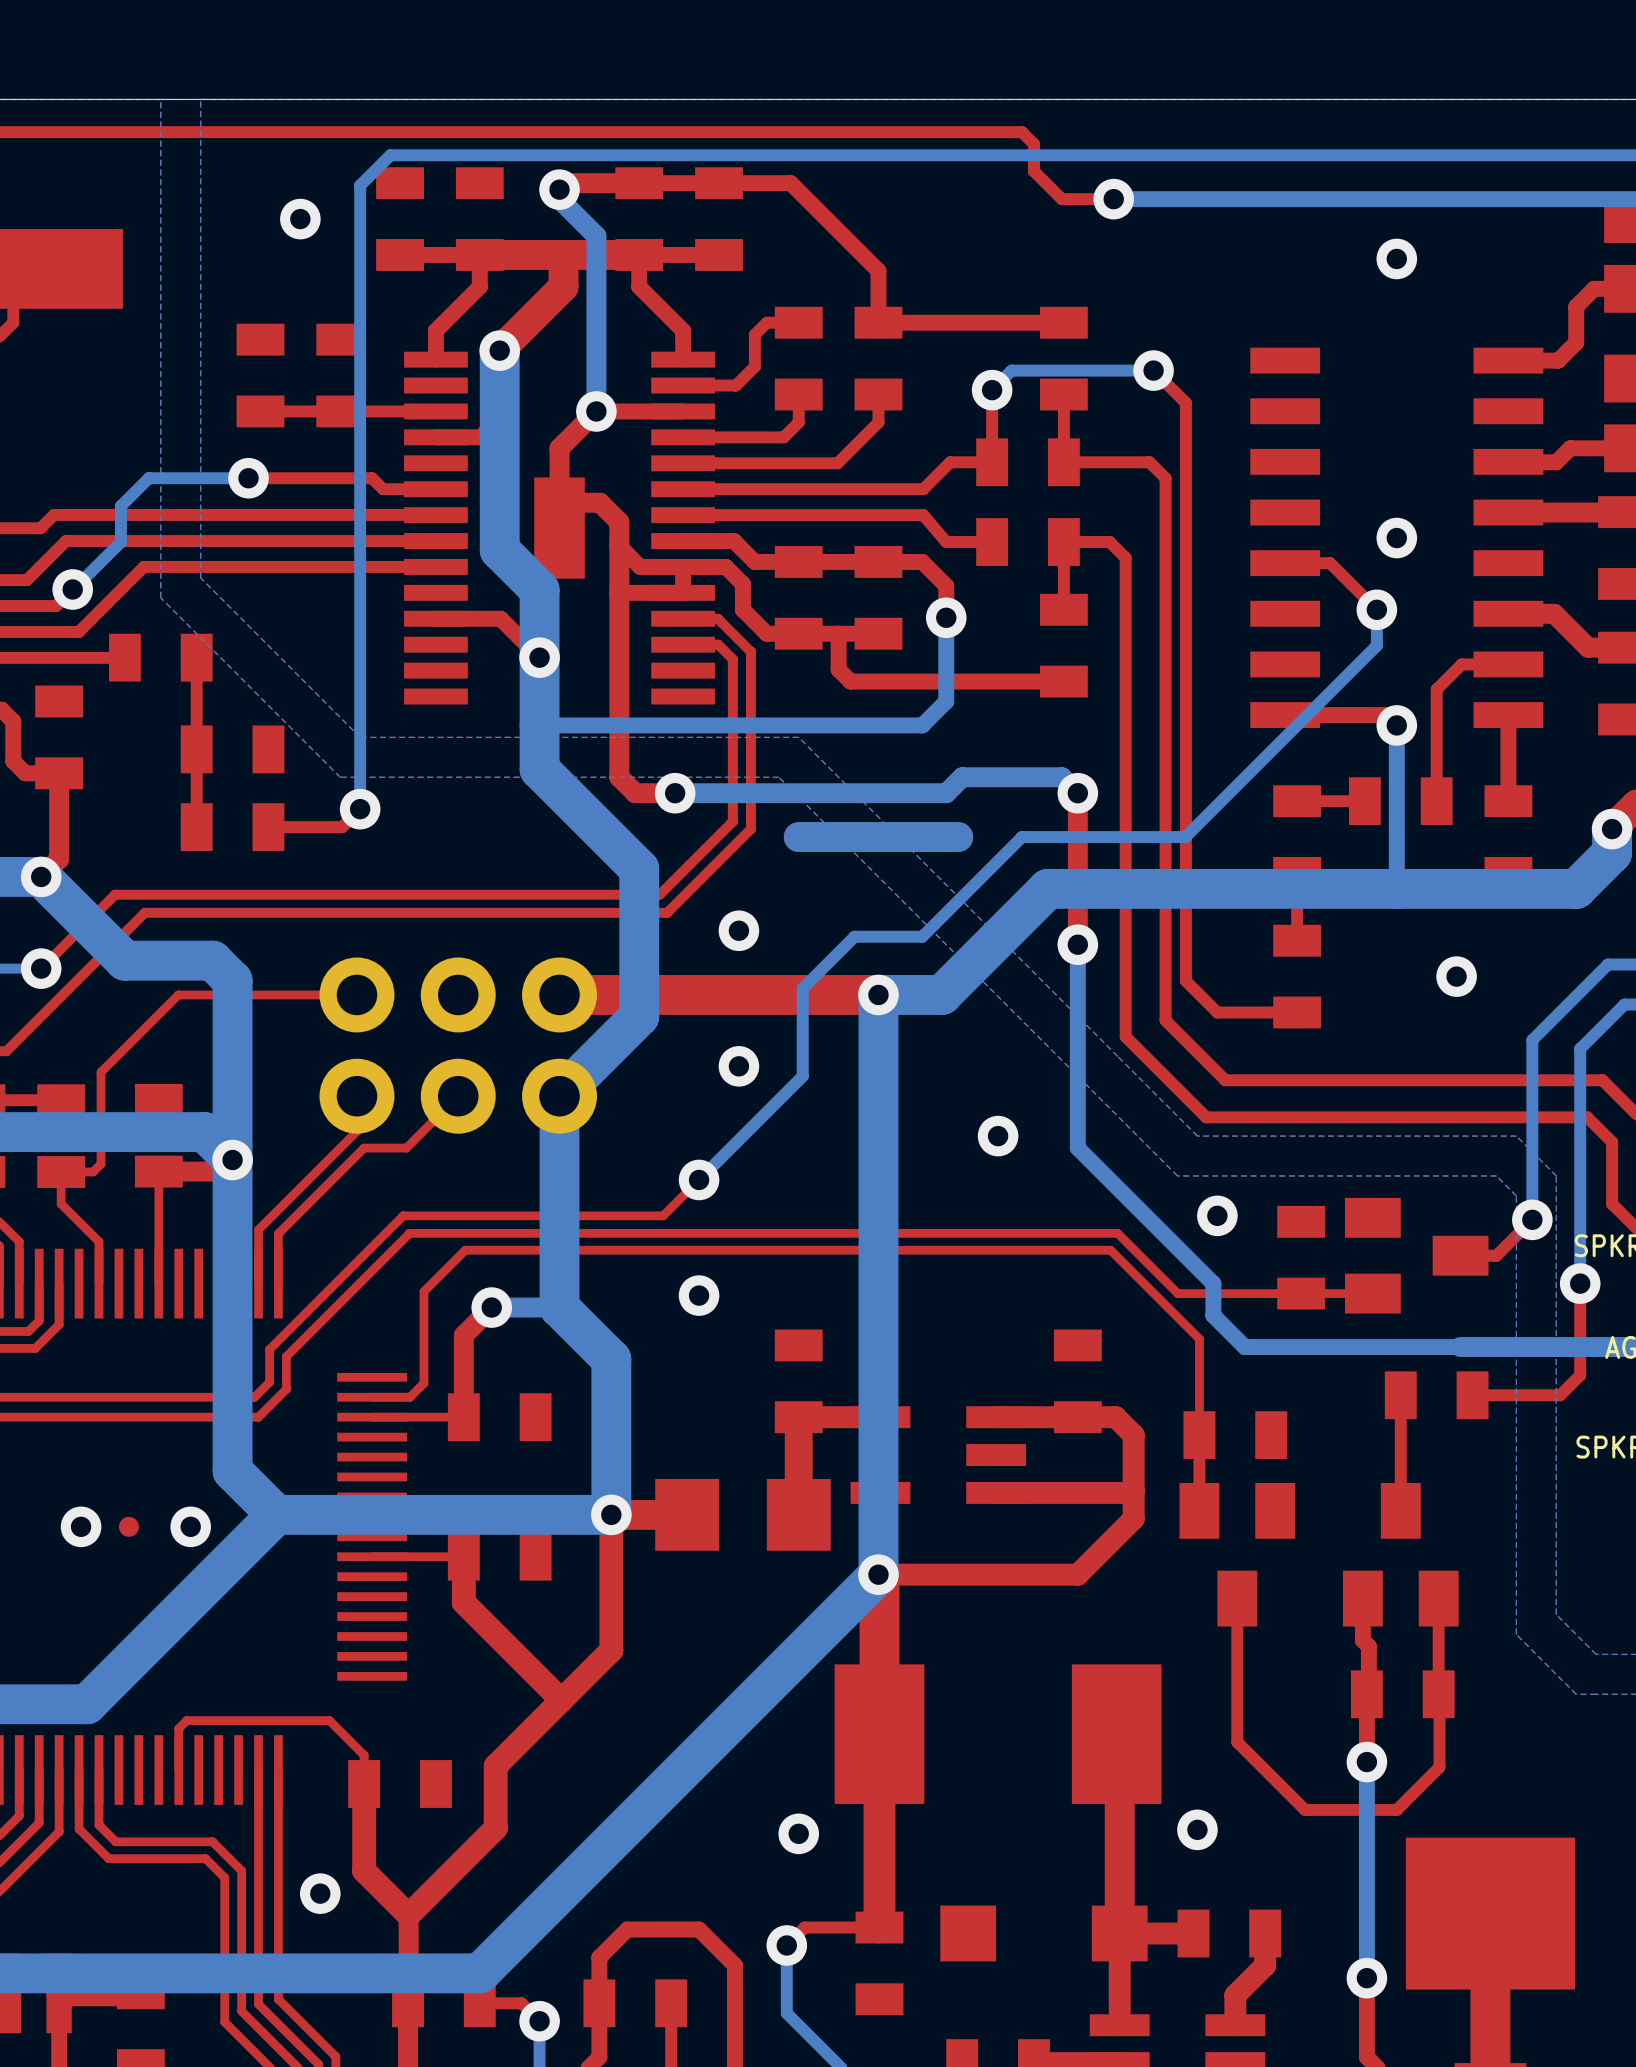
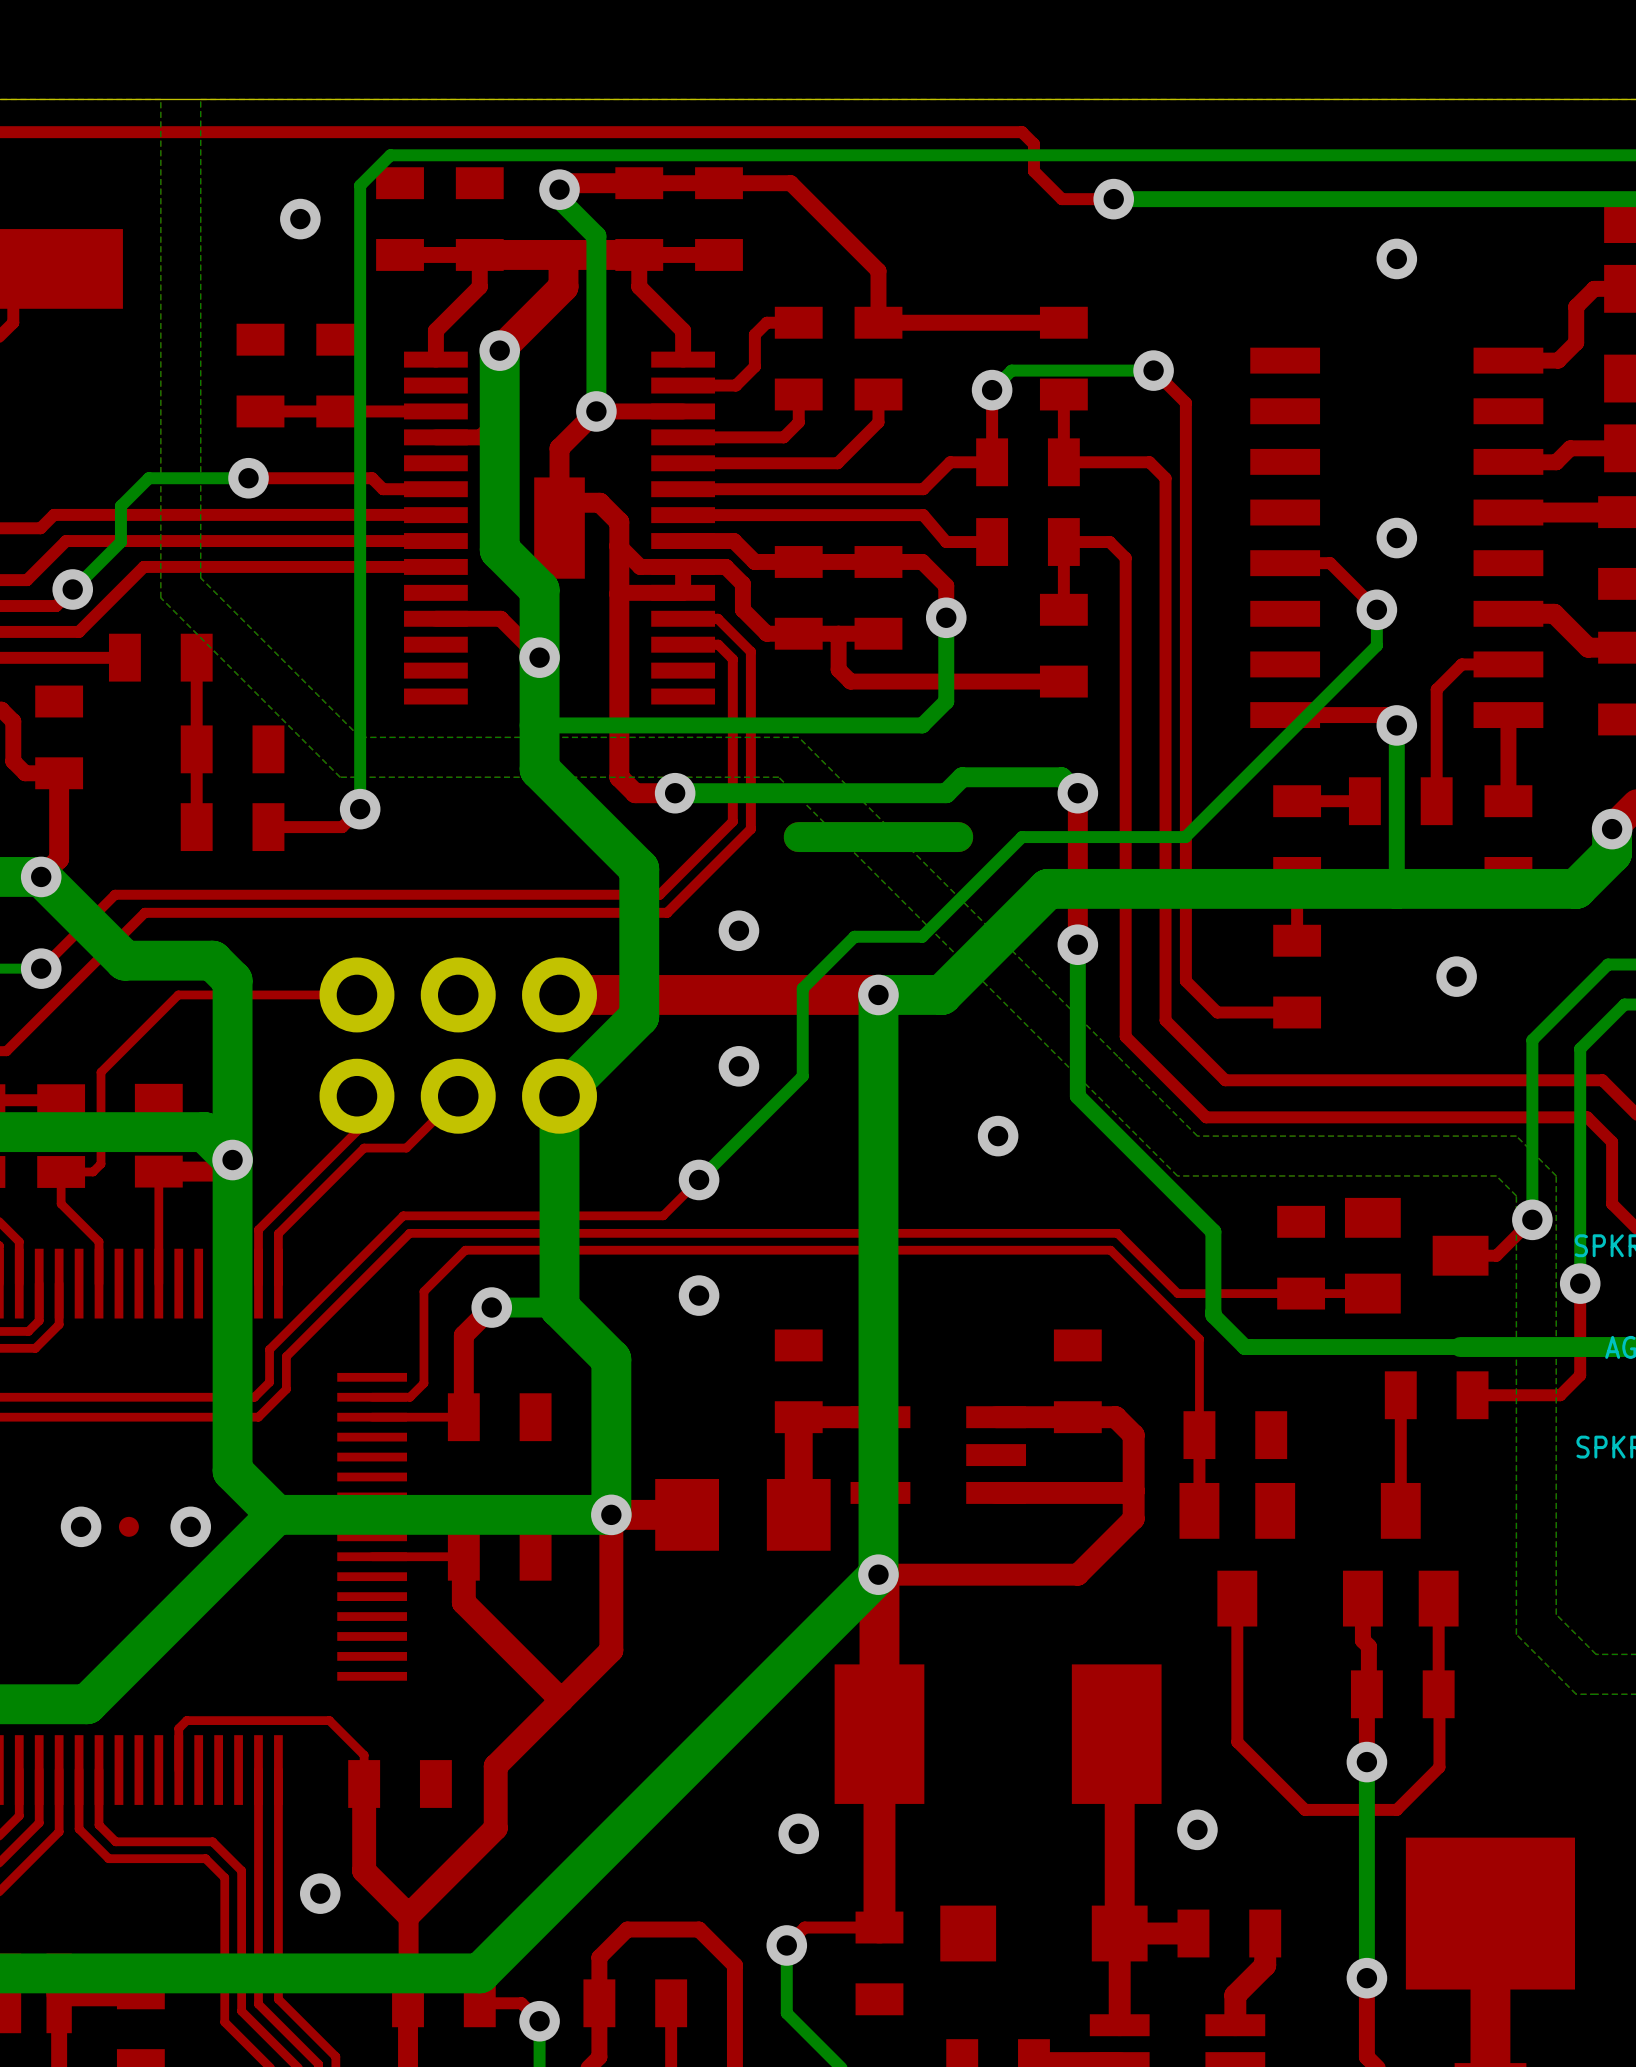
bottom track: (1077, 1096) (1077, 1148) (1213, 1283) -> (1077, 1096) (1213, 1231) (1213, 1283)
via: (1217, 1215) -> none

